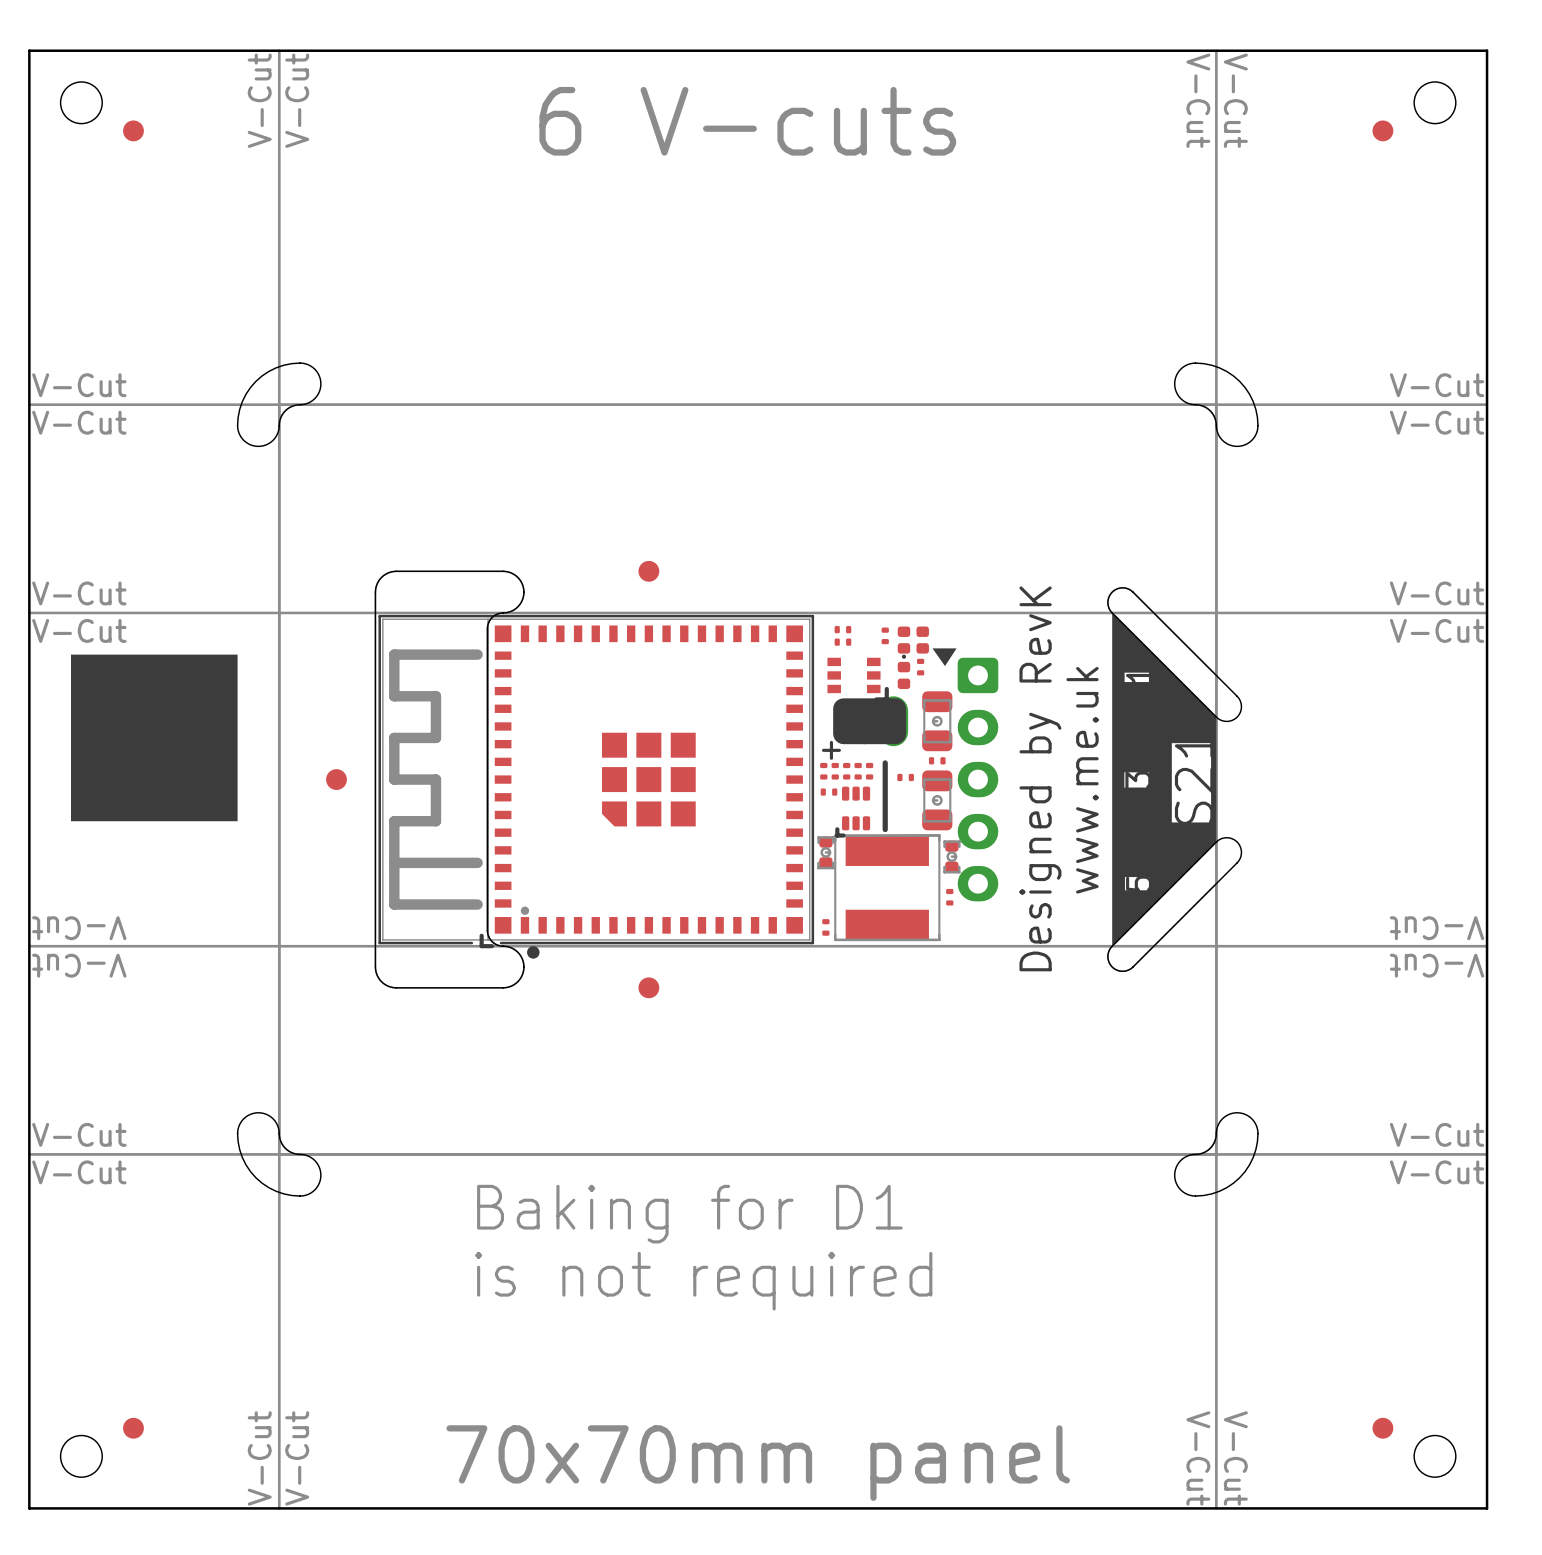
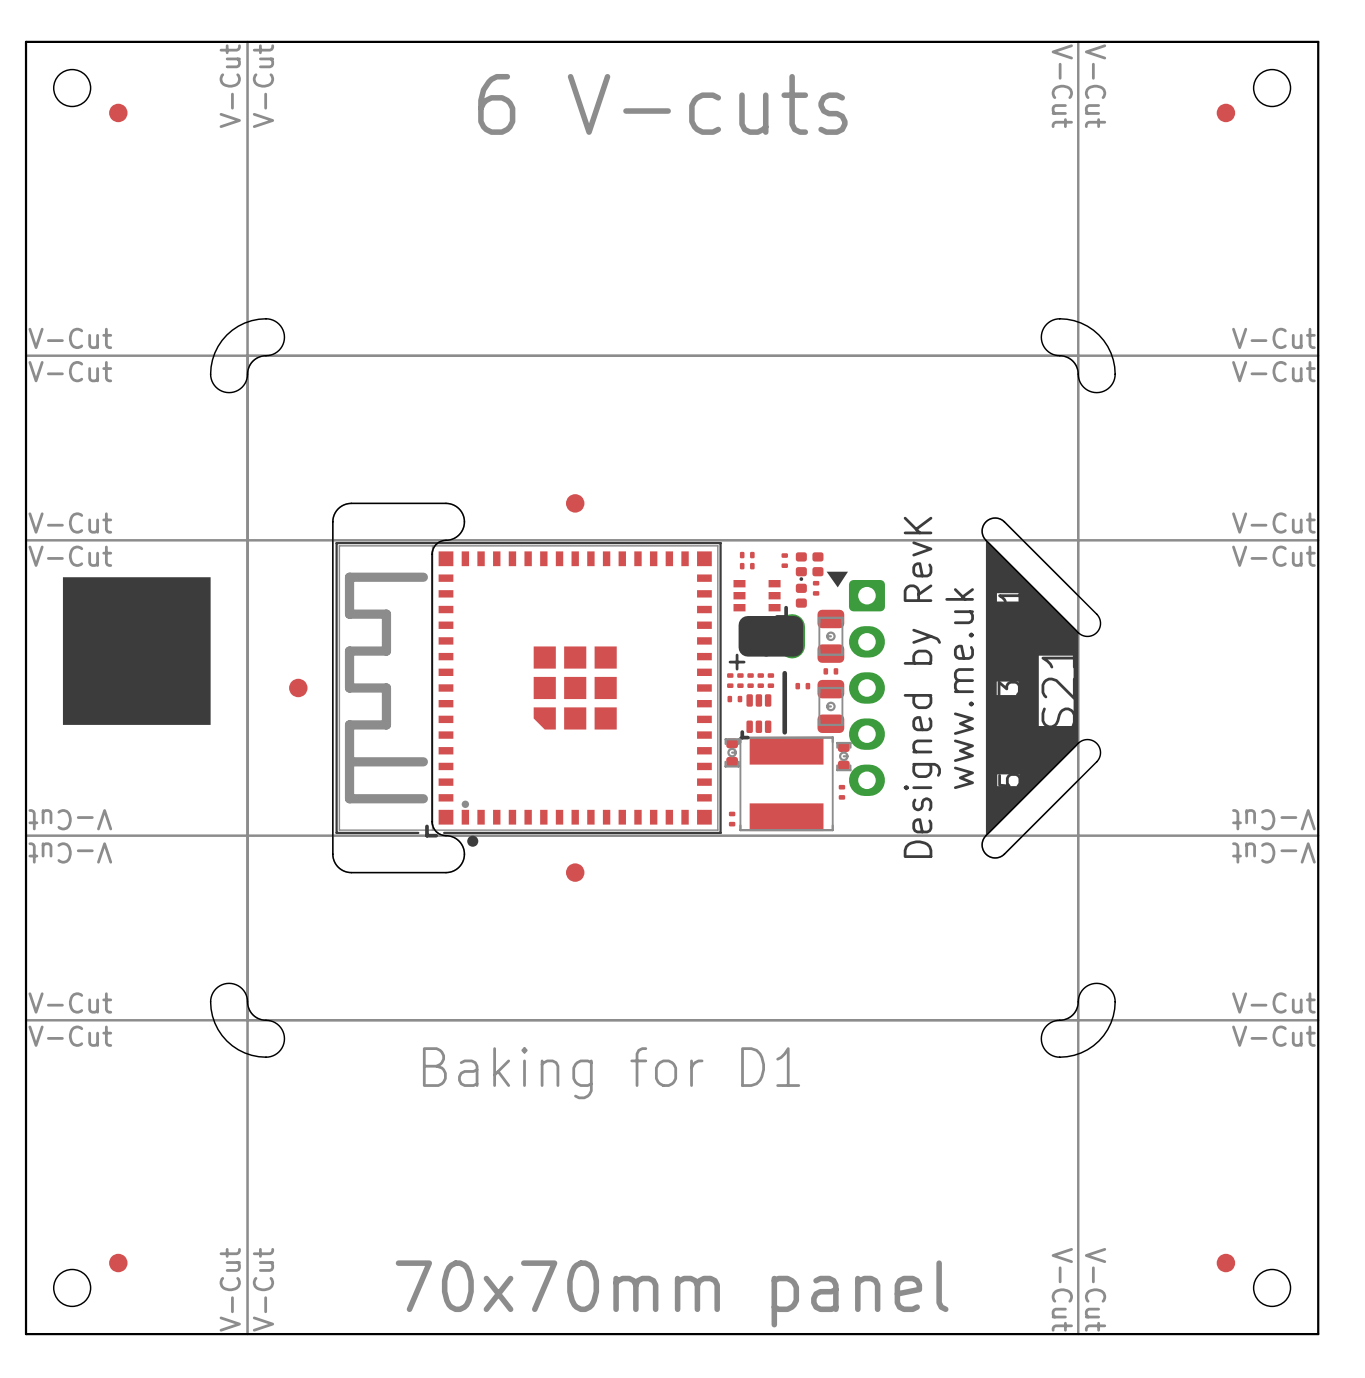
text: is not required (703, 1281) -> none

